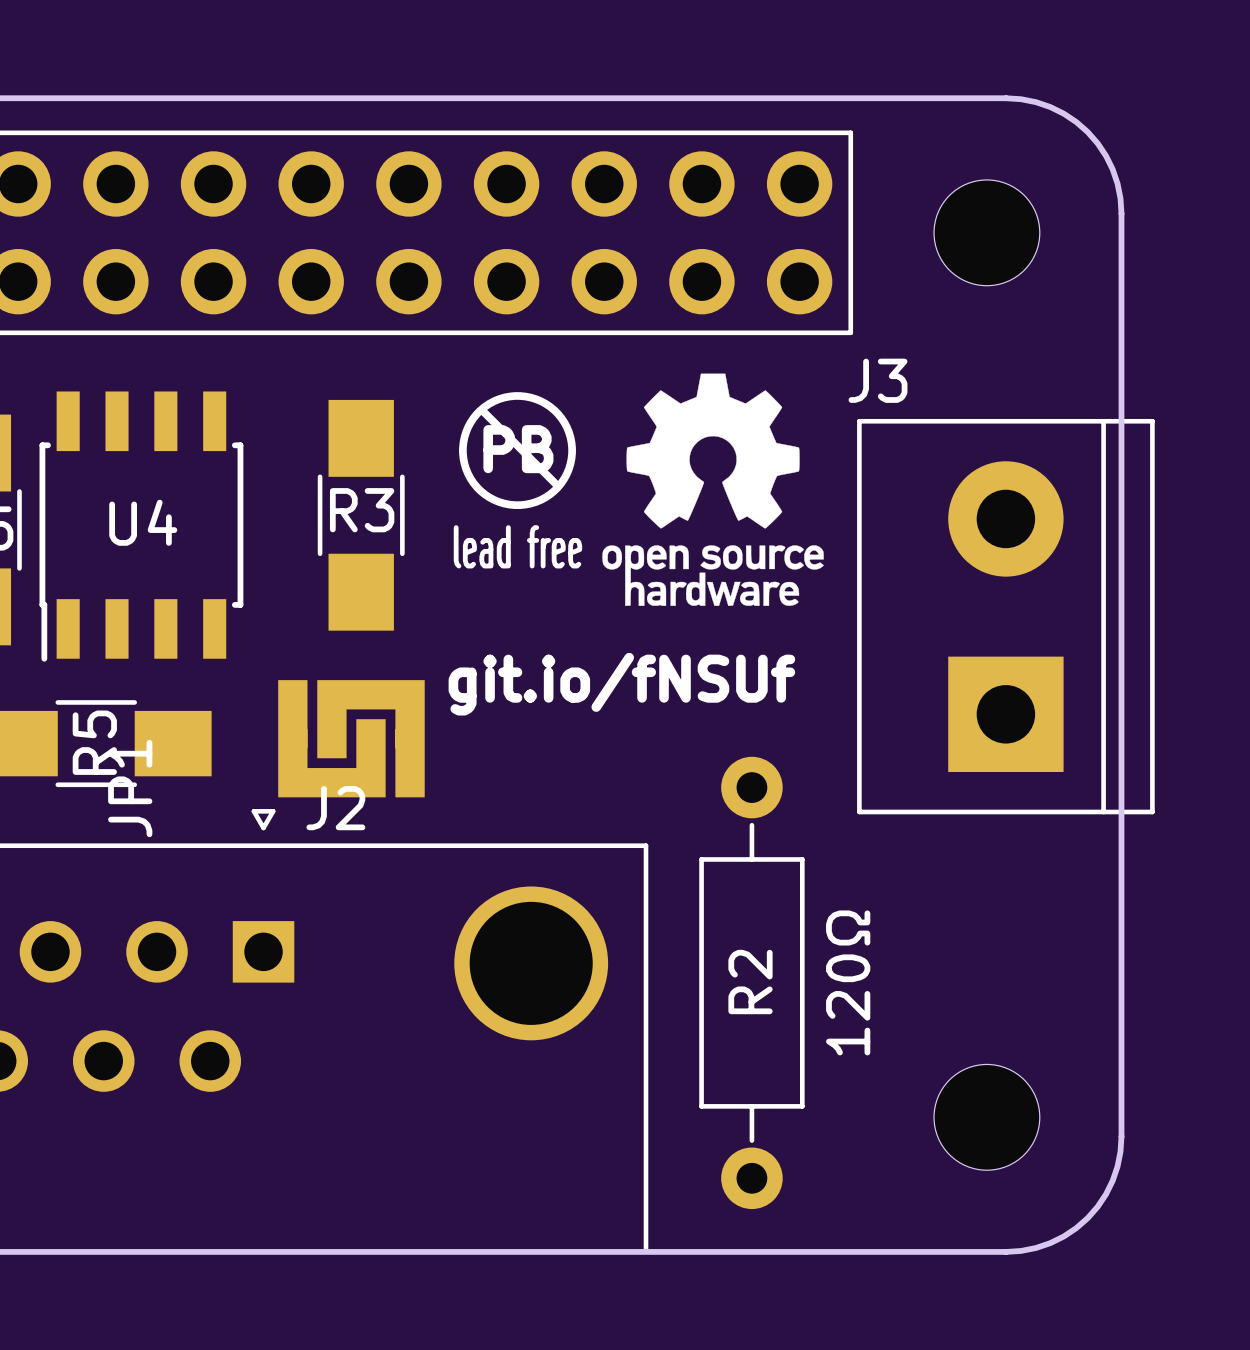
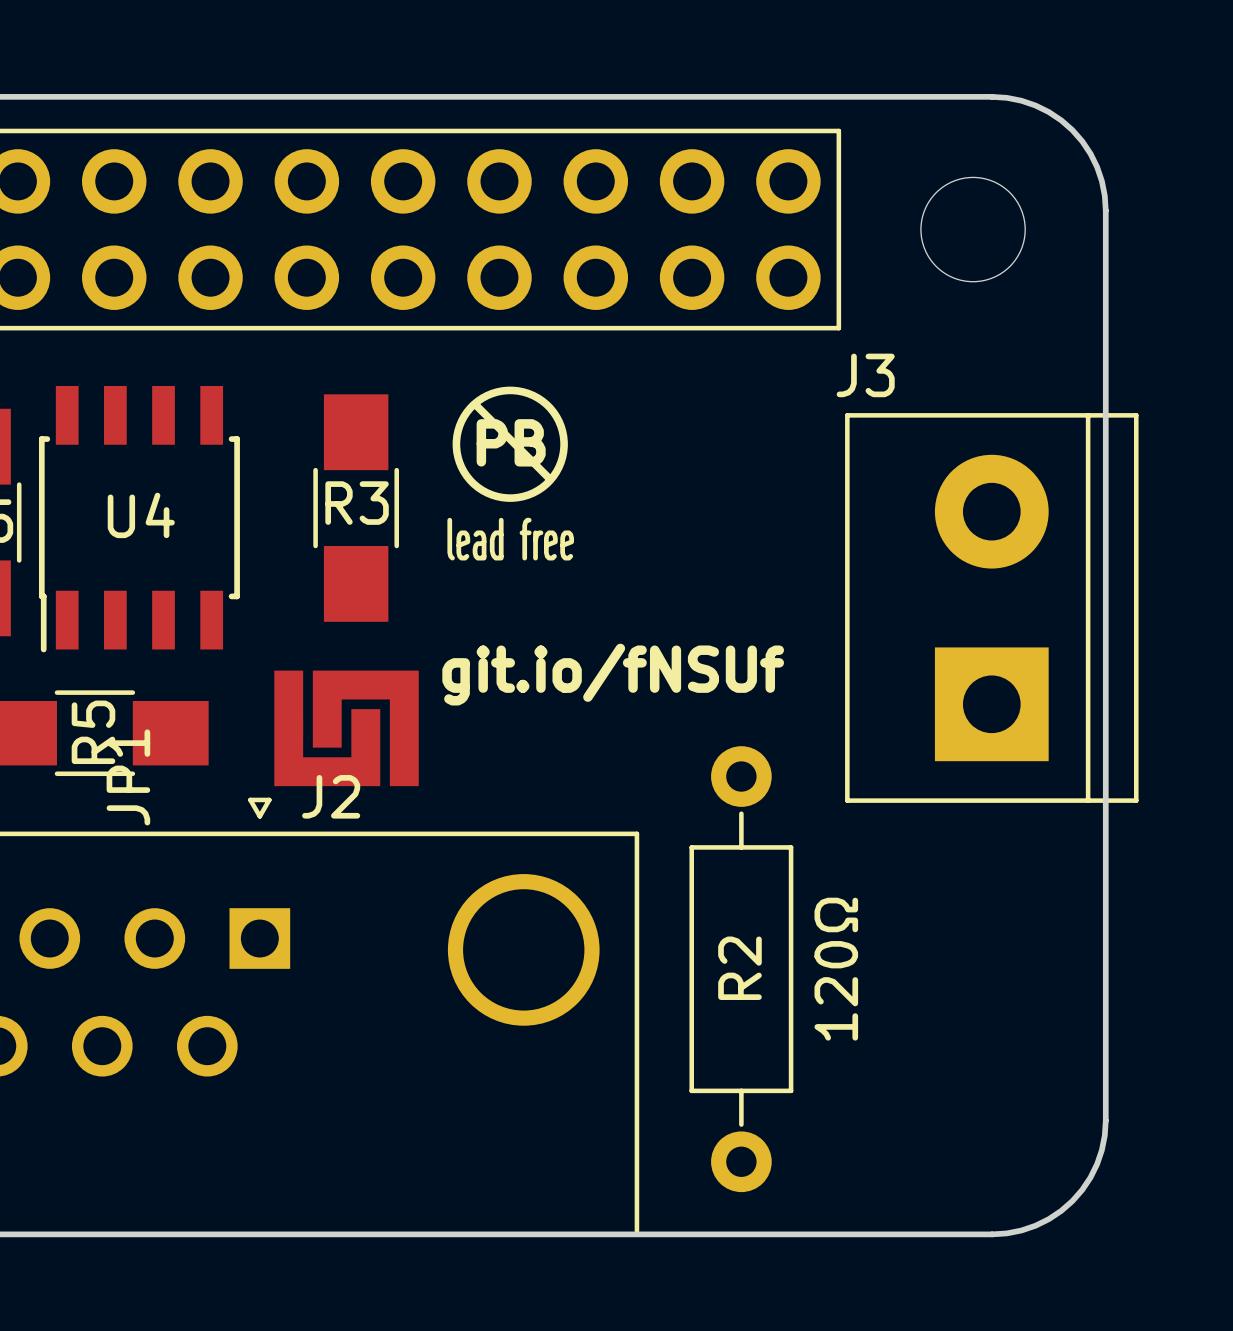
drawing: [602, 373, 824, 606] -> none
part: (986, 1117) -> none

